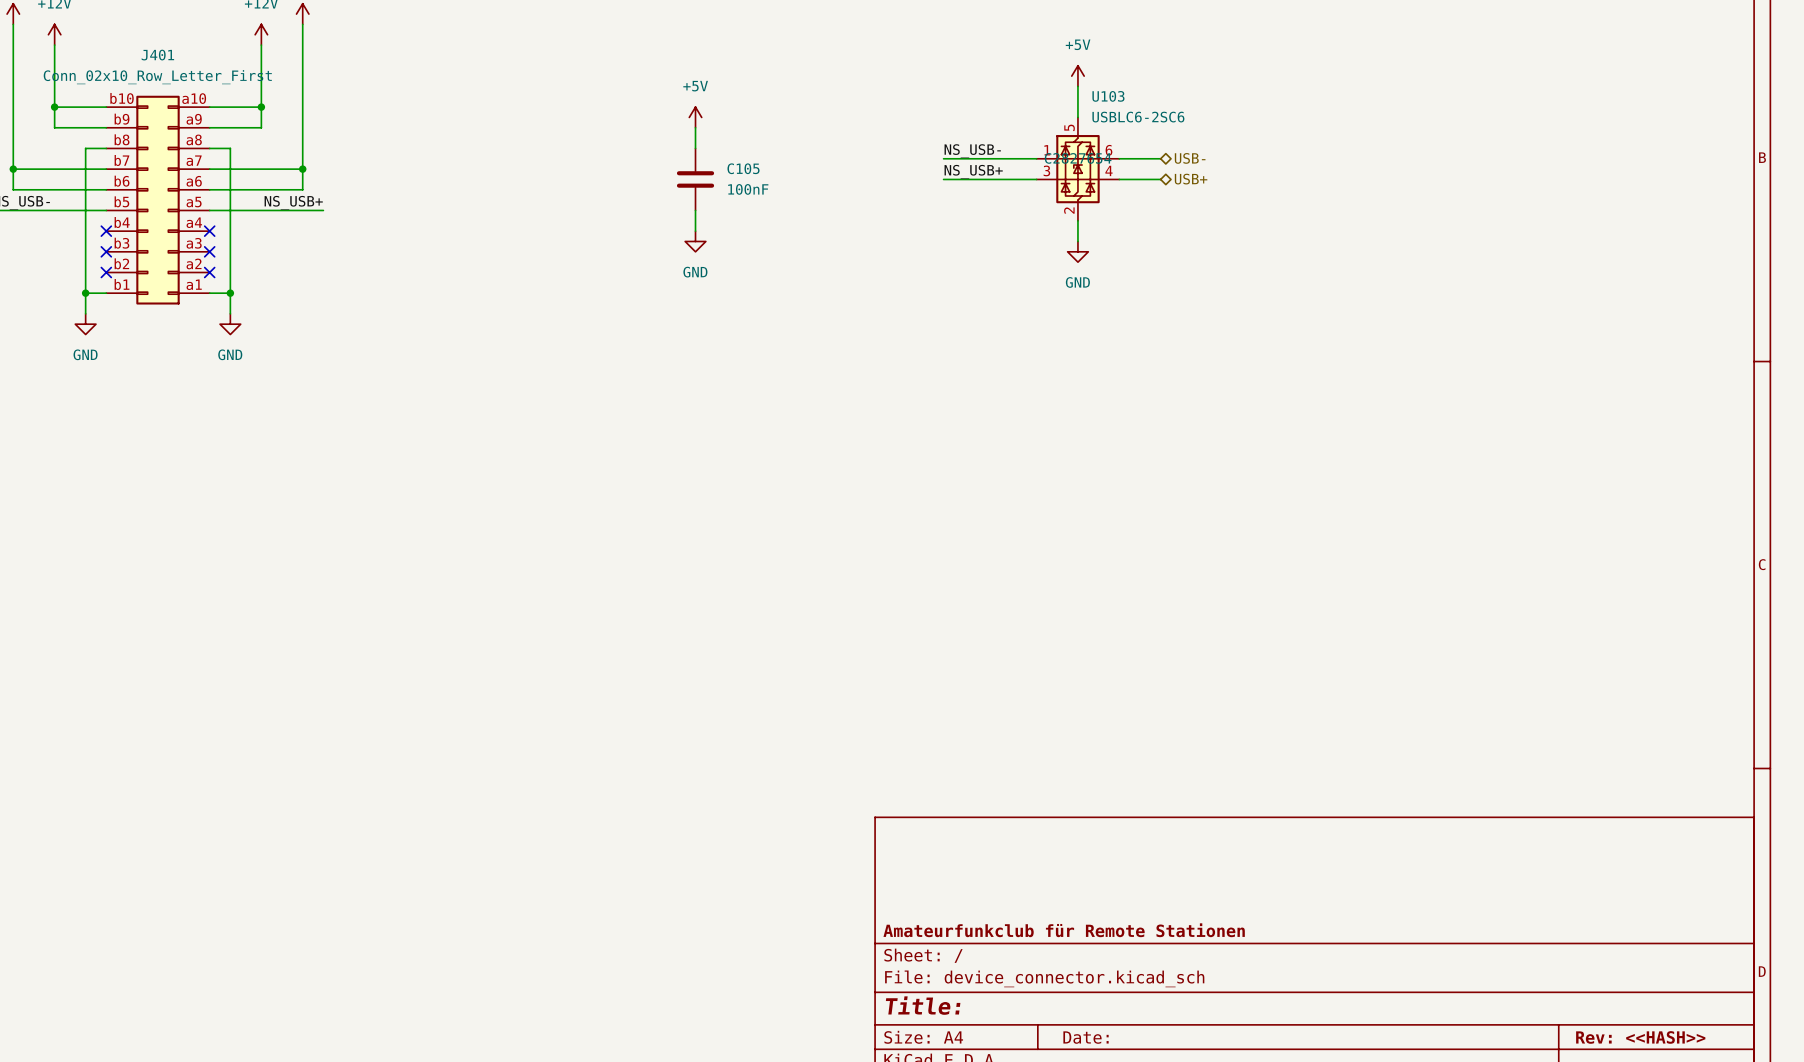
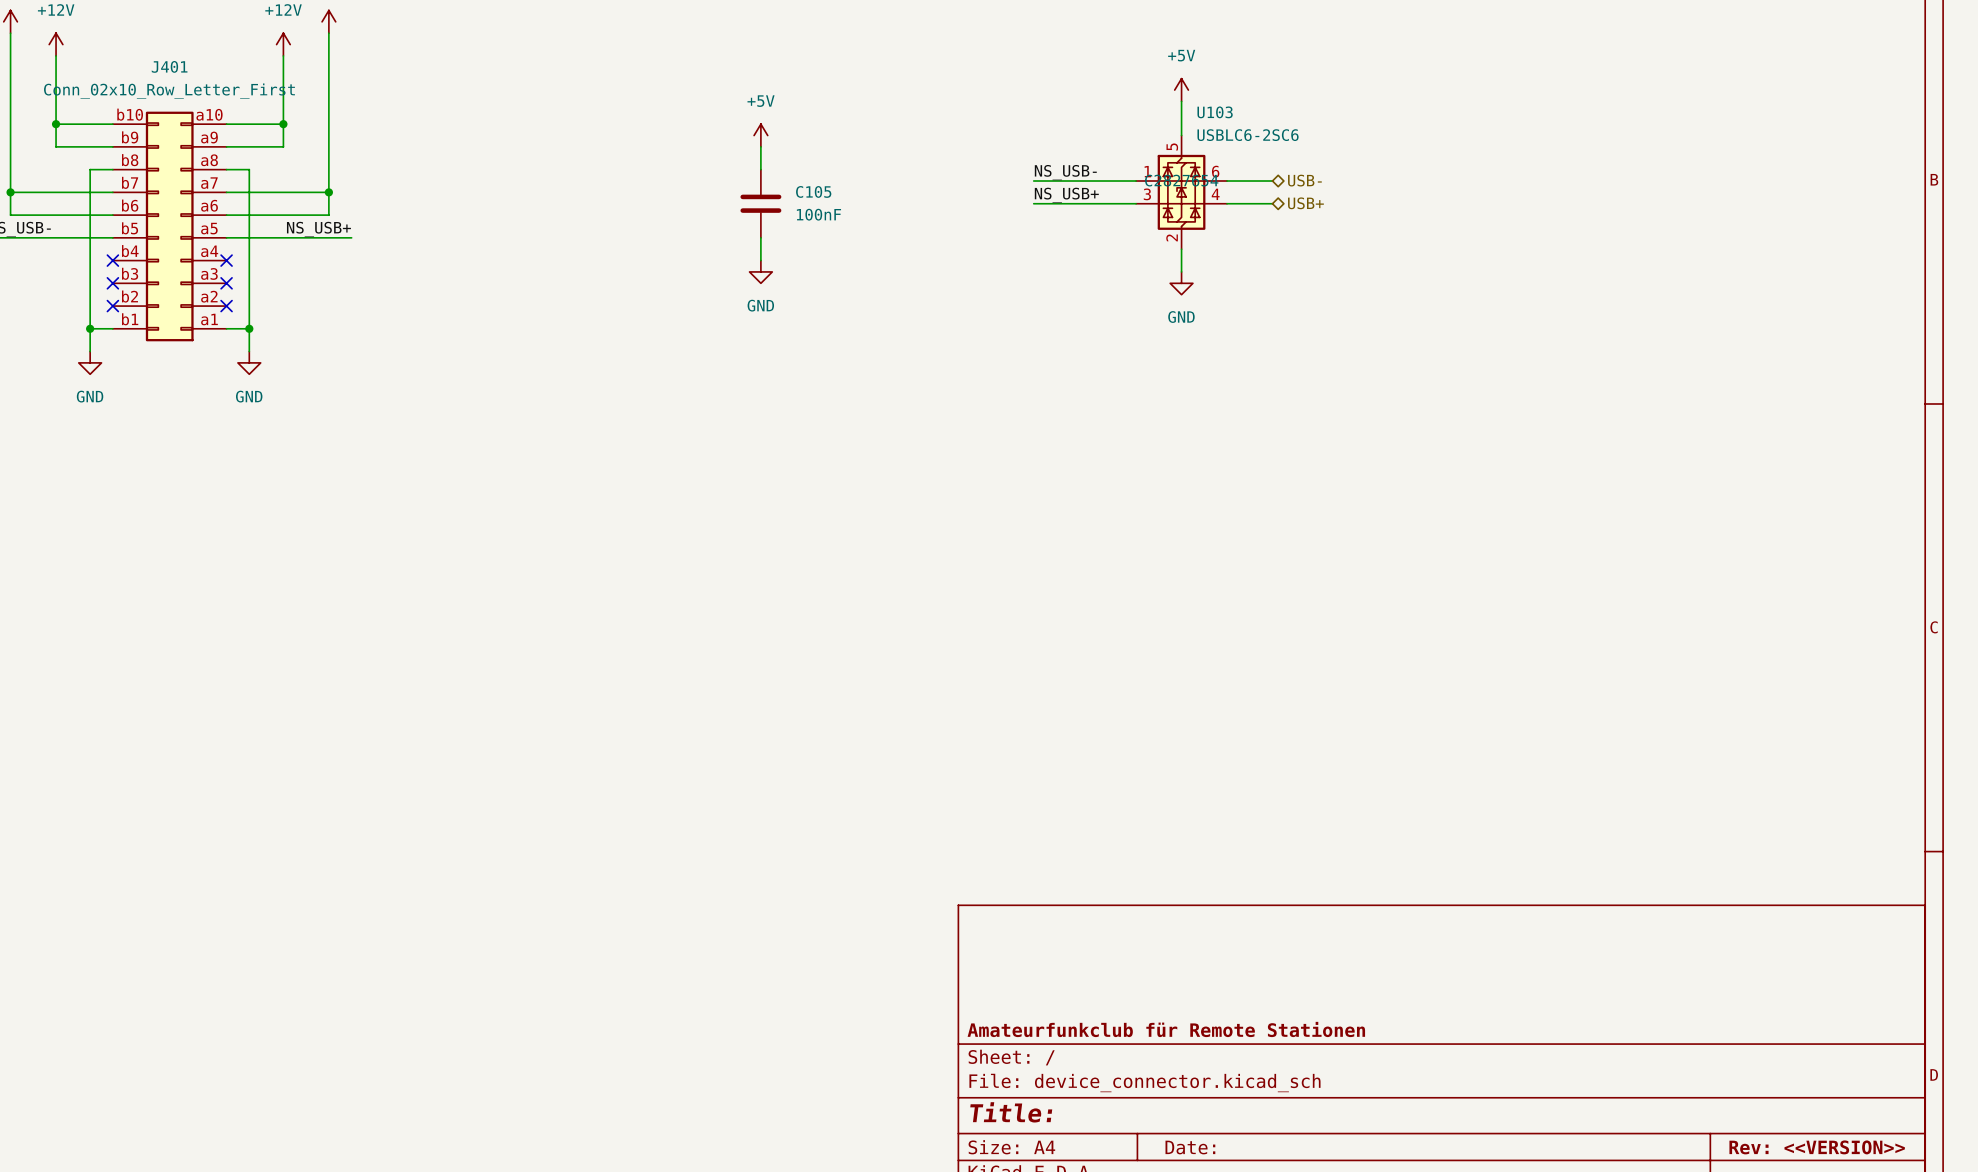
title block: Rev: <<HASH>> (1640, 1037) -> Rev: <<VERSION>> (1817, 1147)

